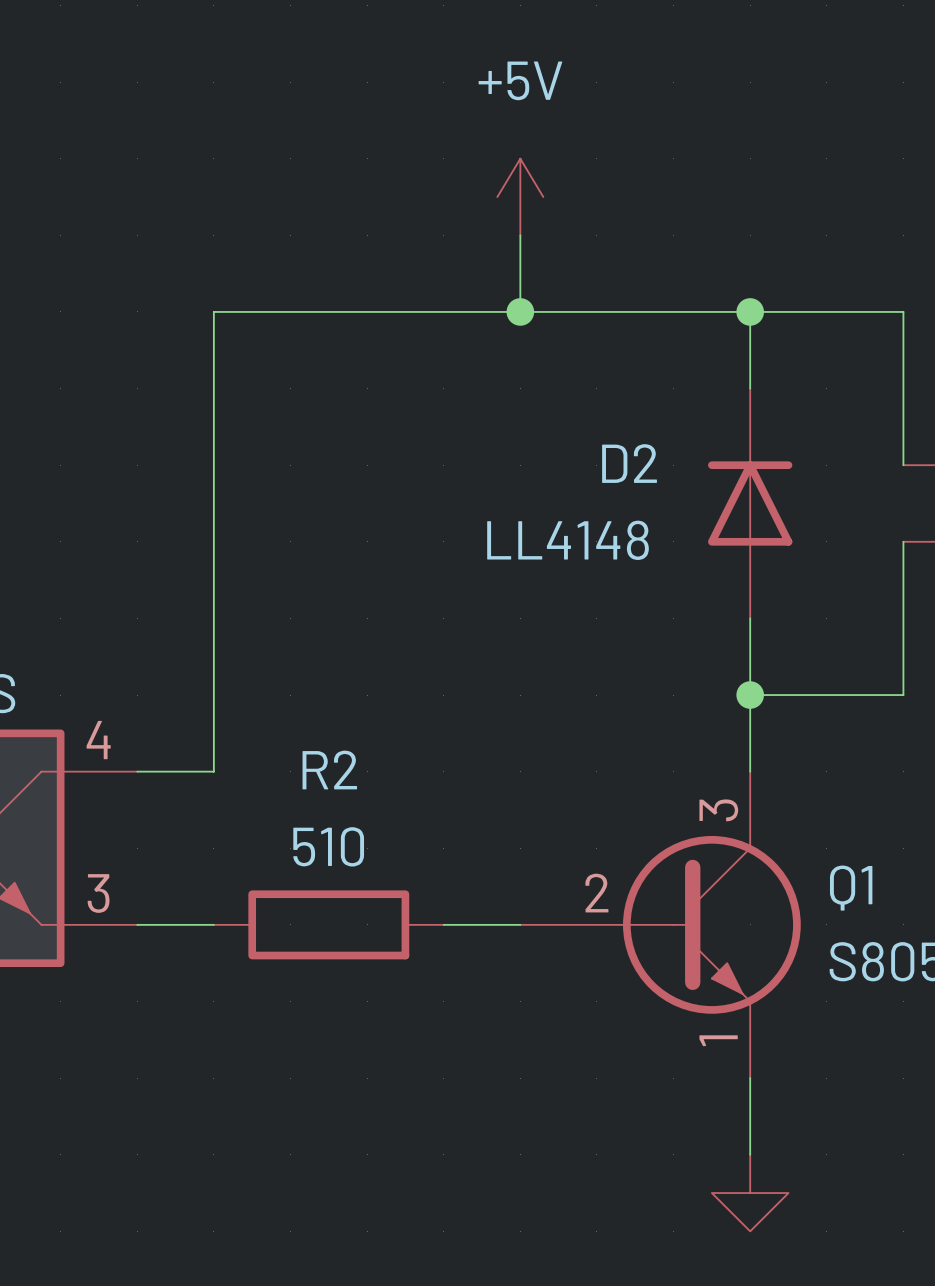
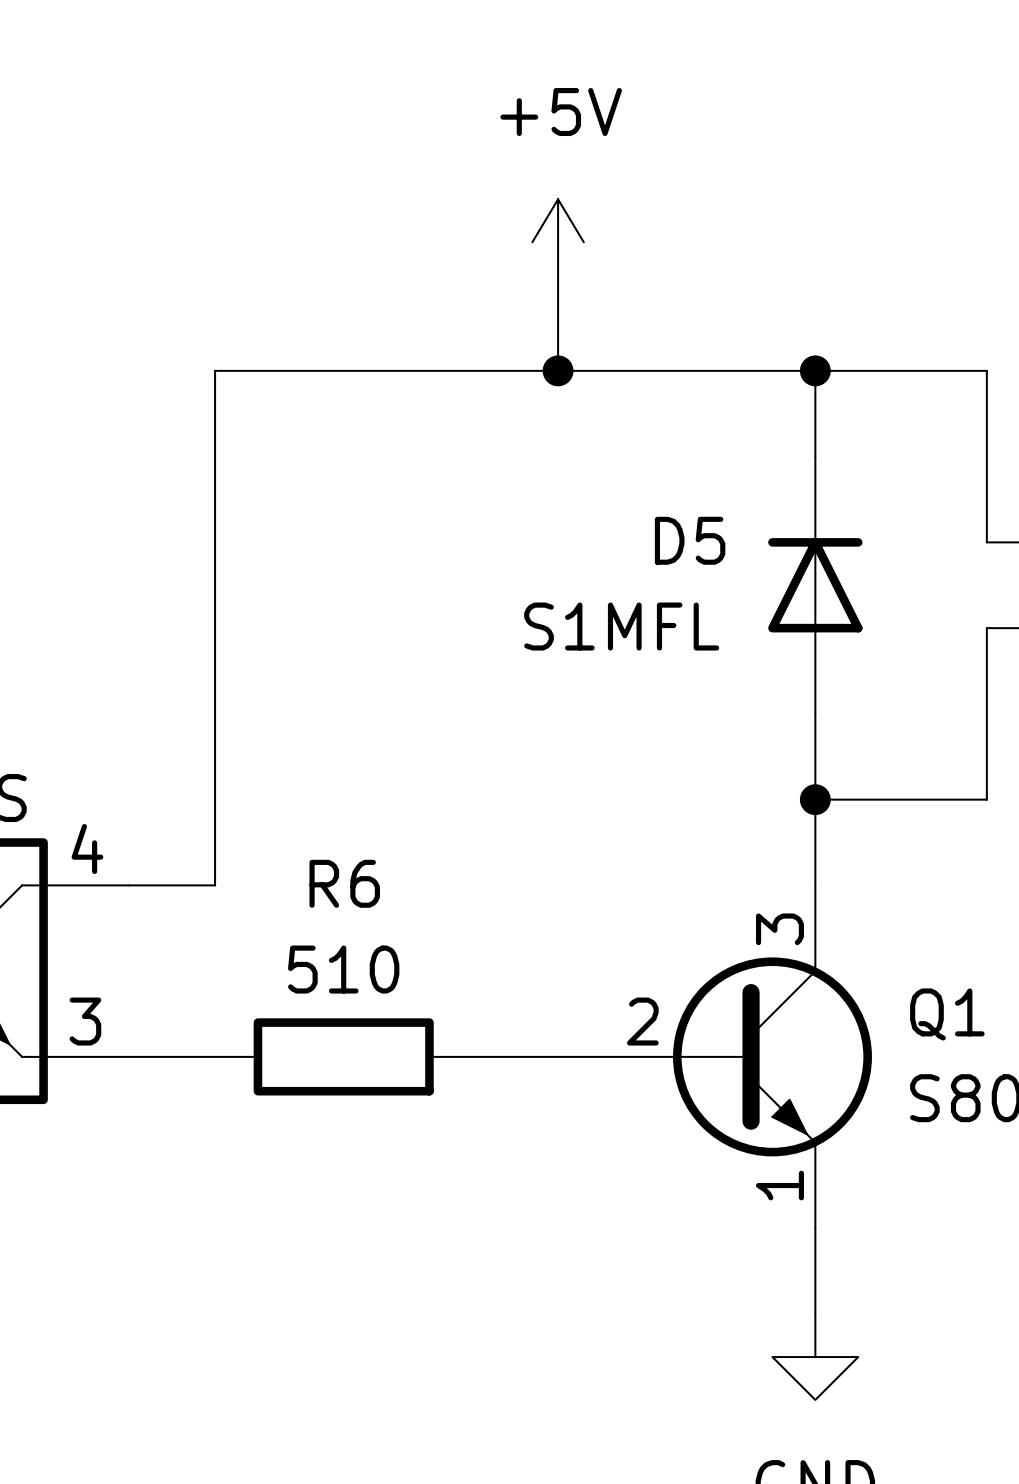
D2 name: D2 (629, 463) -> D5 (690, 540)
D2 value: LL4148 (568, 540) -> S1MFL (621, 626)
R2 name: R2 (329, 770) -> R6 (344, 883)

